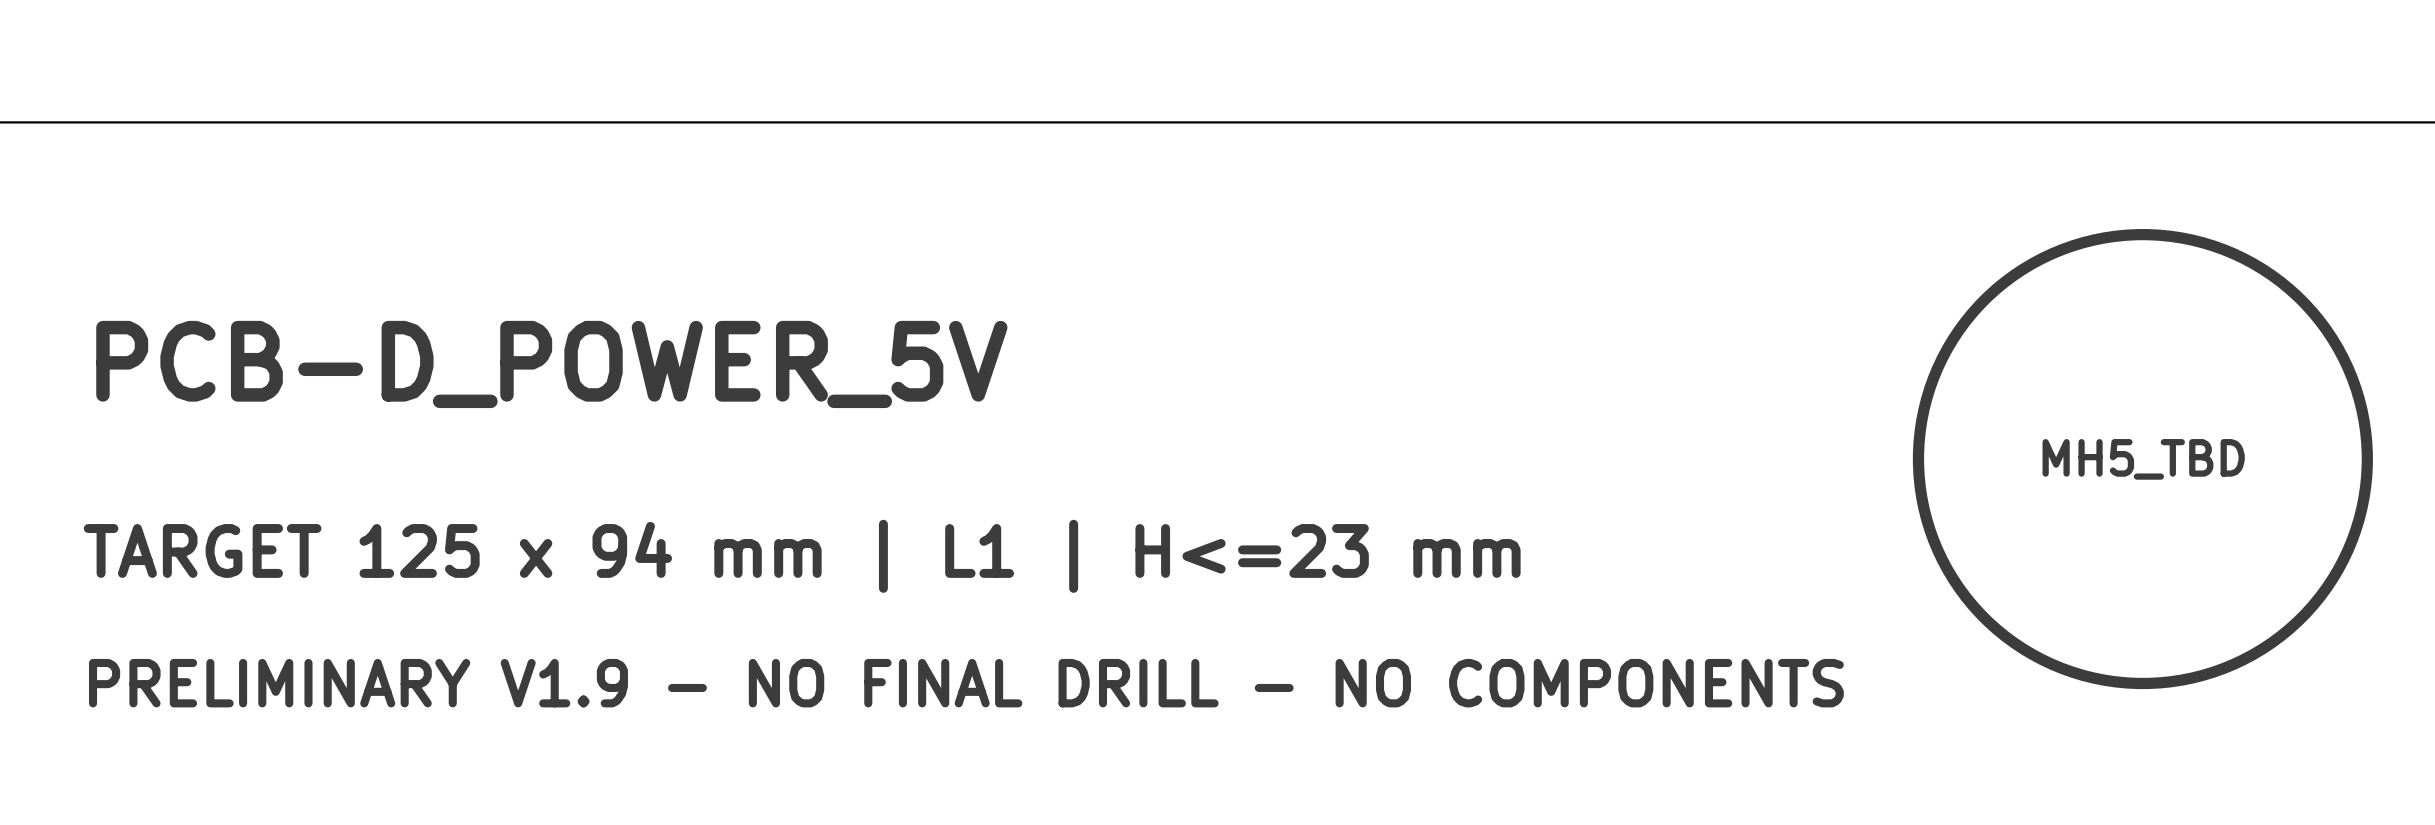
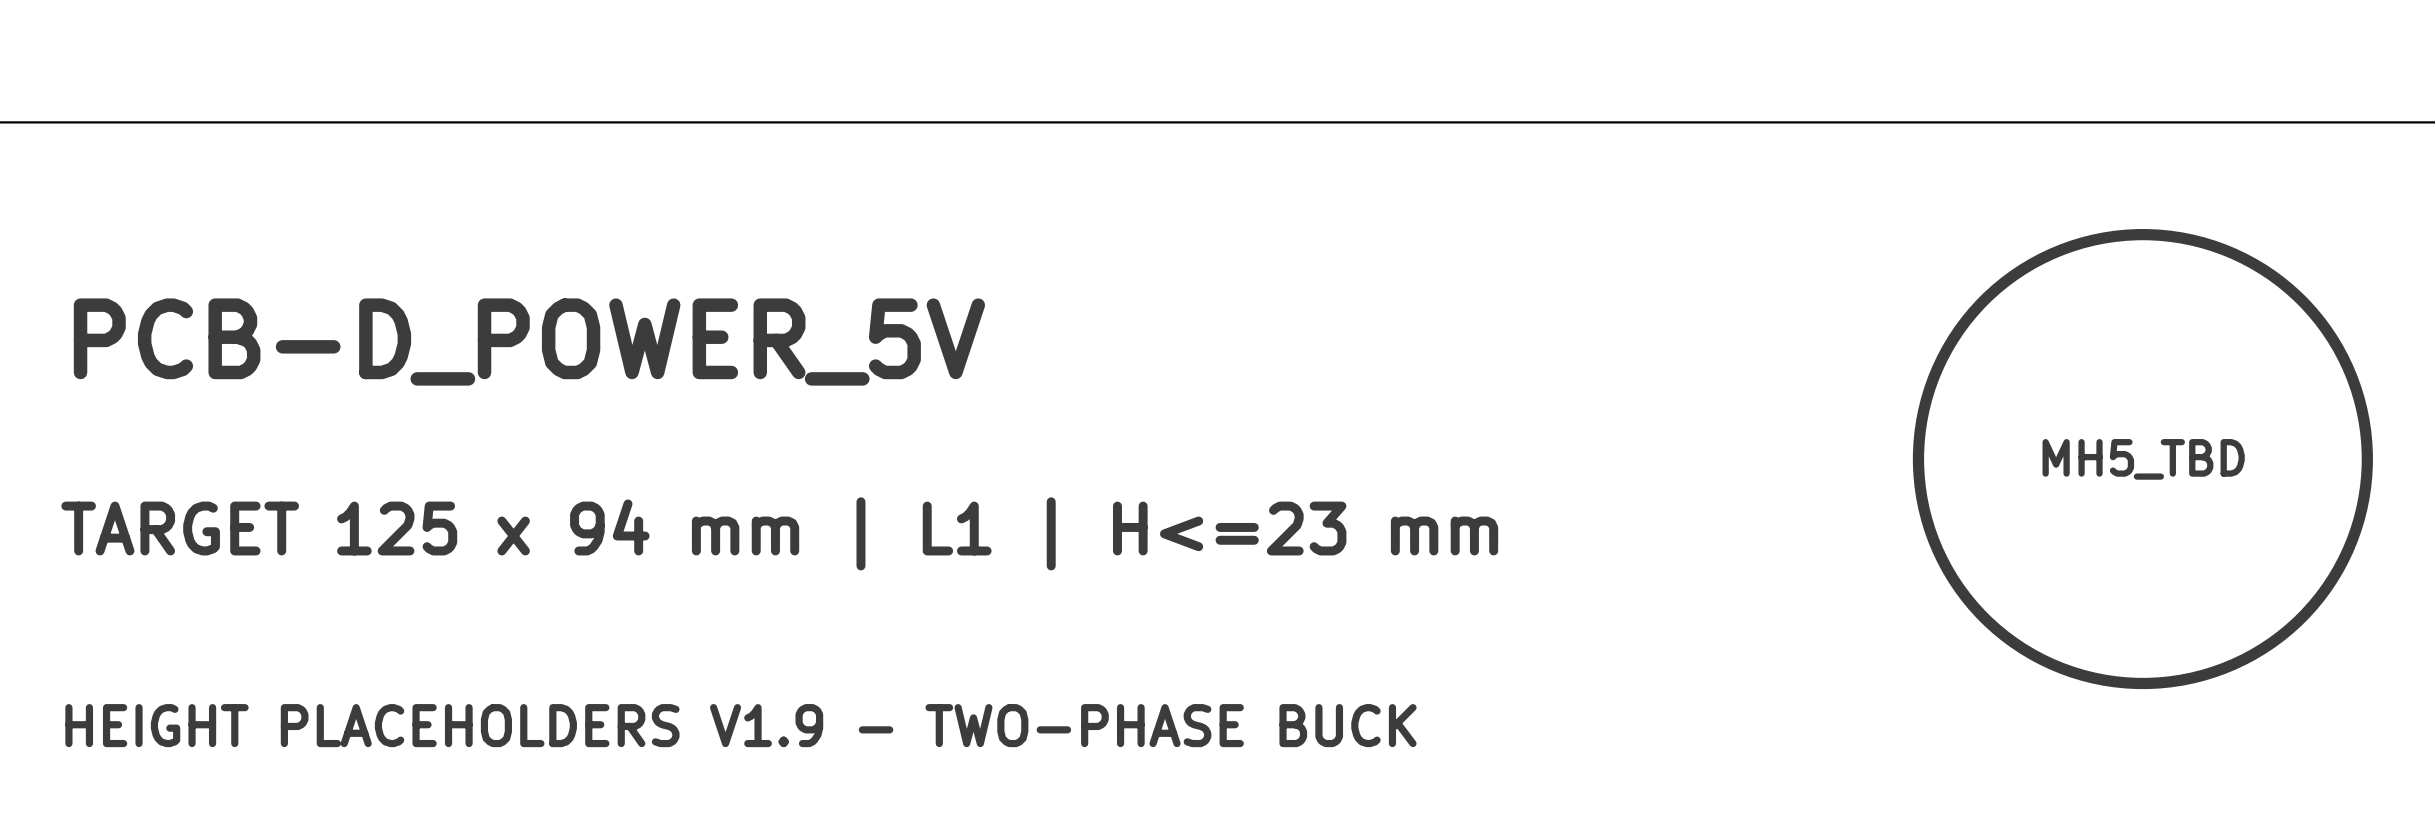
text position: PCB-D_POWER_5V (551, 364) -> PCB-D_POWER_5V (529, 342)
text position: TARGET 125 x 94 mm | L1 | H<=23 mm (802, 556) -> TARGET 125 x 94 mm | L1 | H<=23 mm (779, 533)
text: PRELIMINARY V1.9 - NO FINAL DRILL - NO COMPONENTS (966, 683) -> none
text: none -> HEIGHT PLACEHOLDERS V1.9 - TWO-PHASE BUCK (740, 725)

